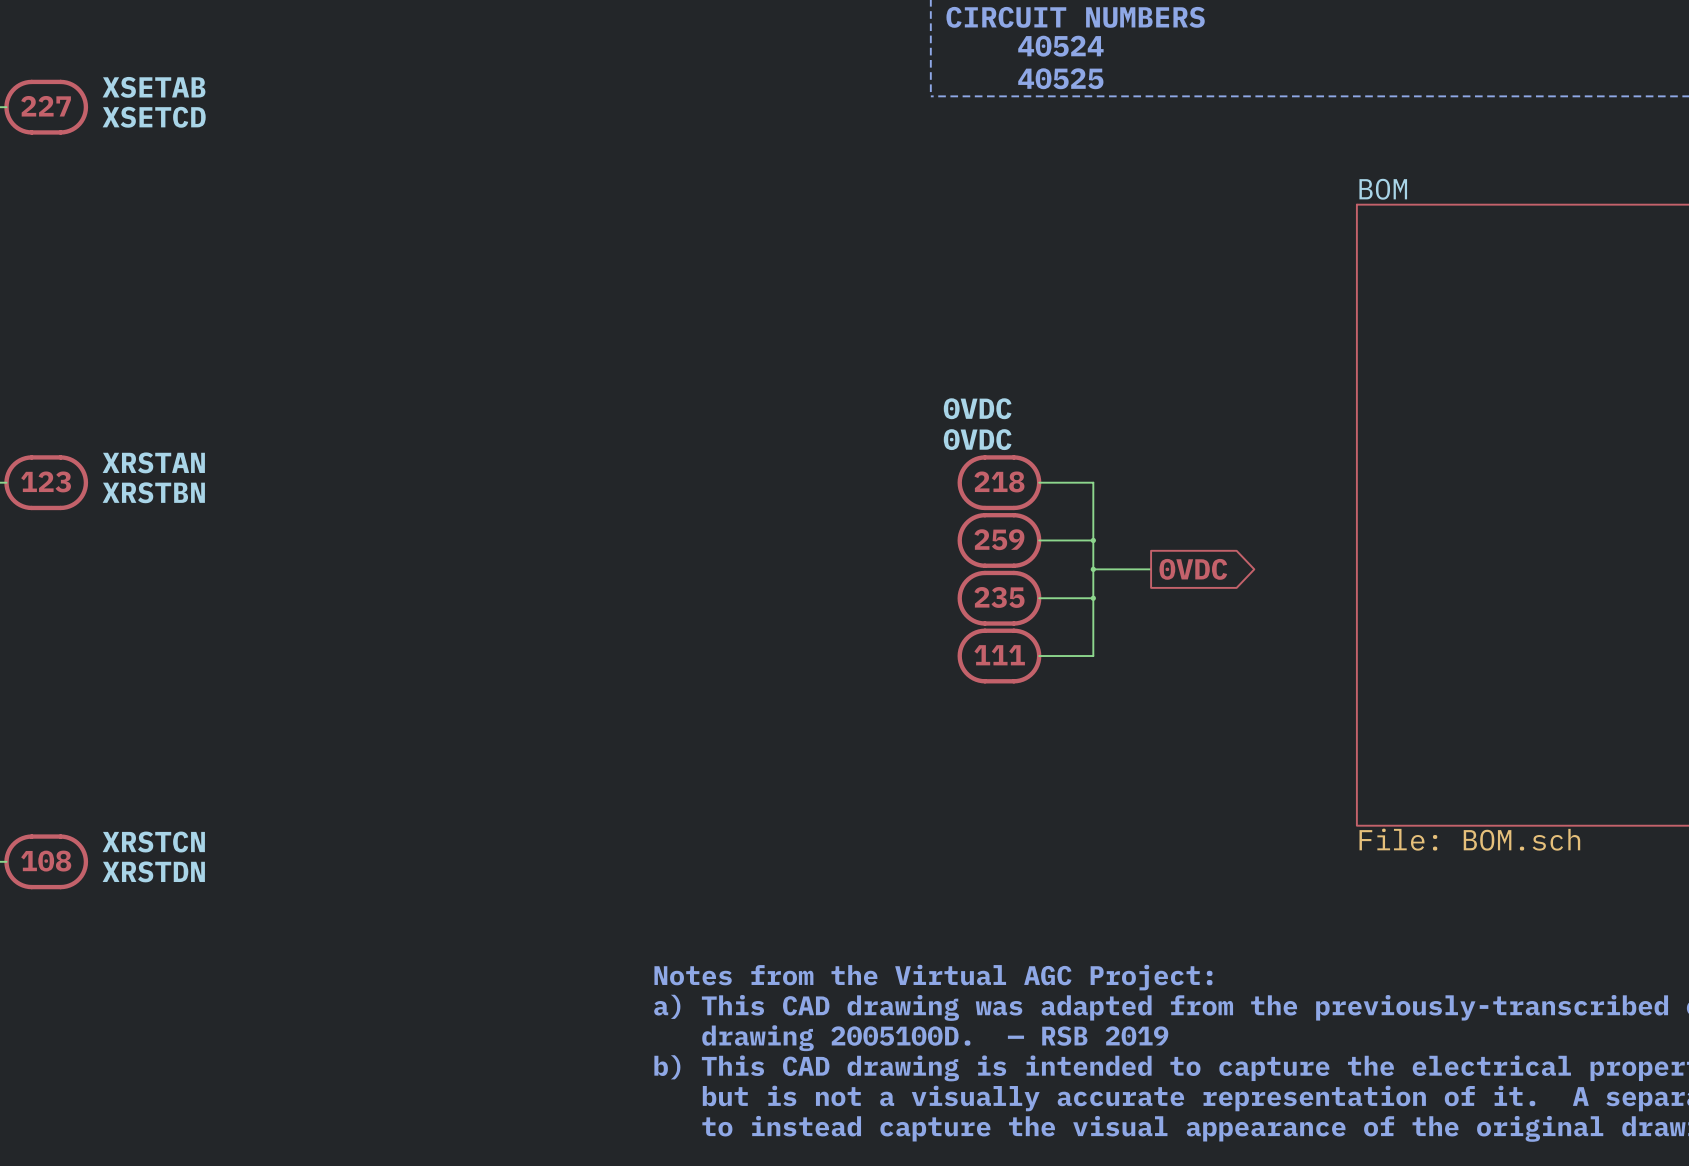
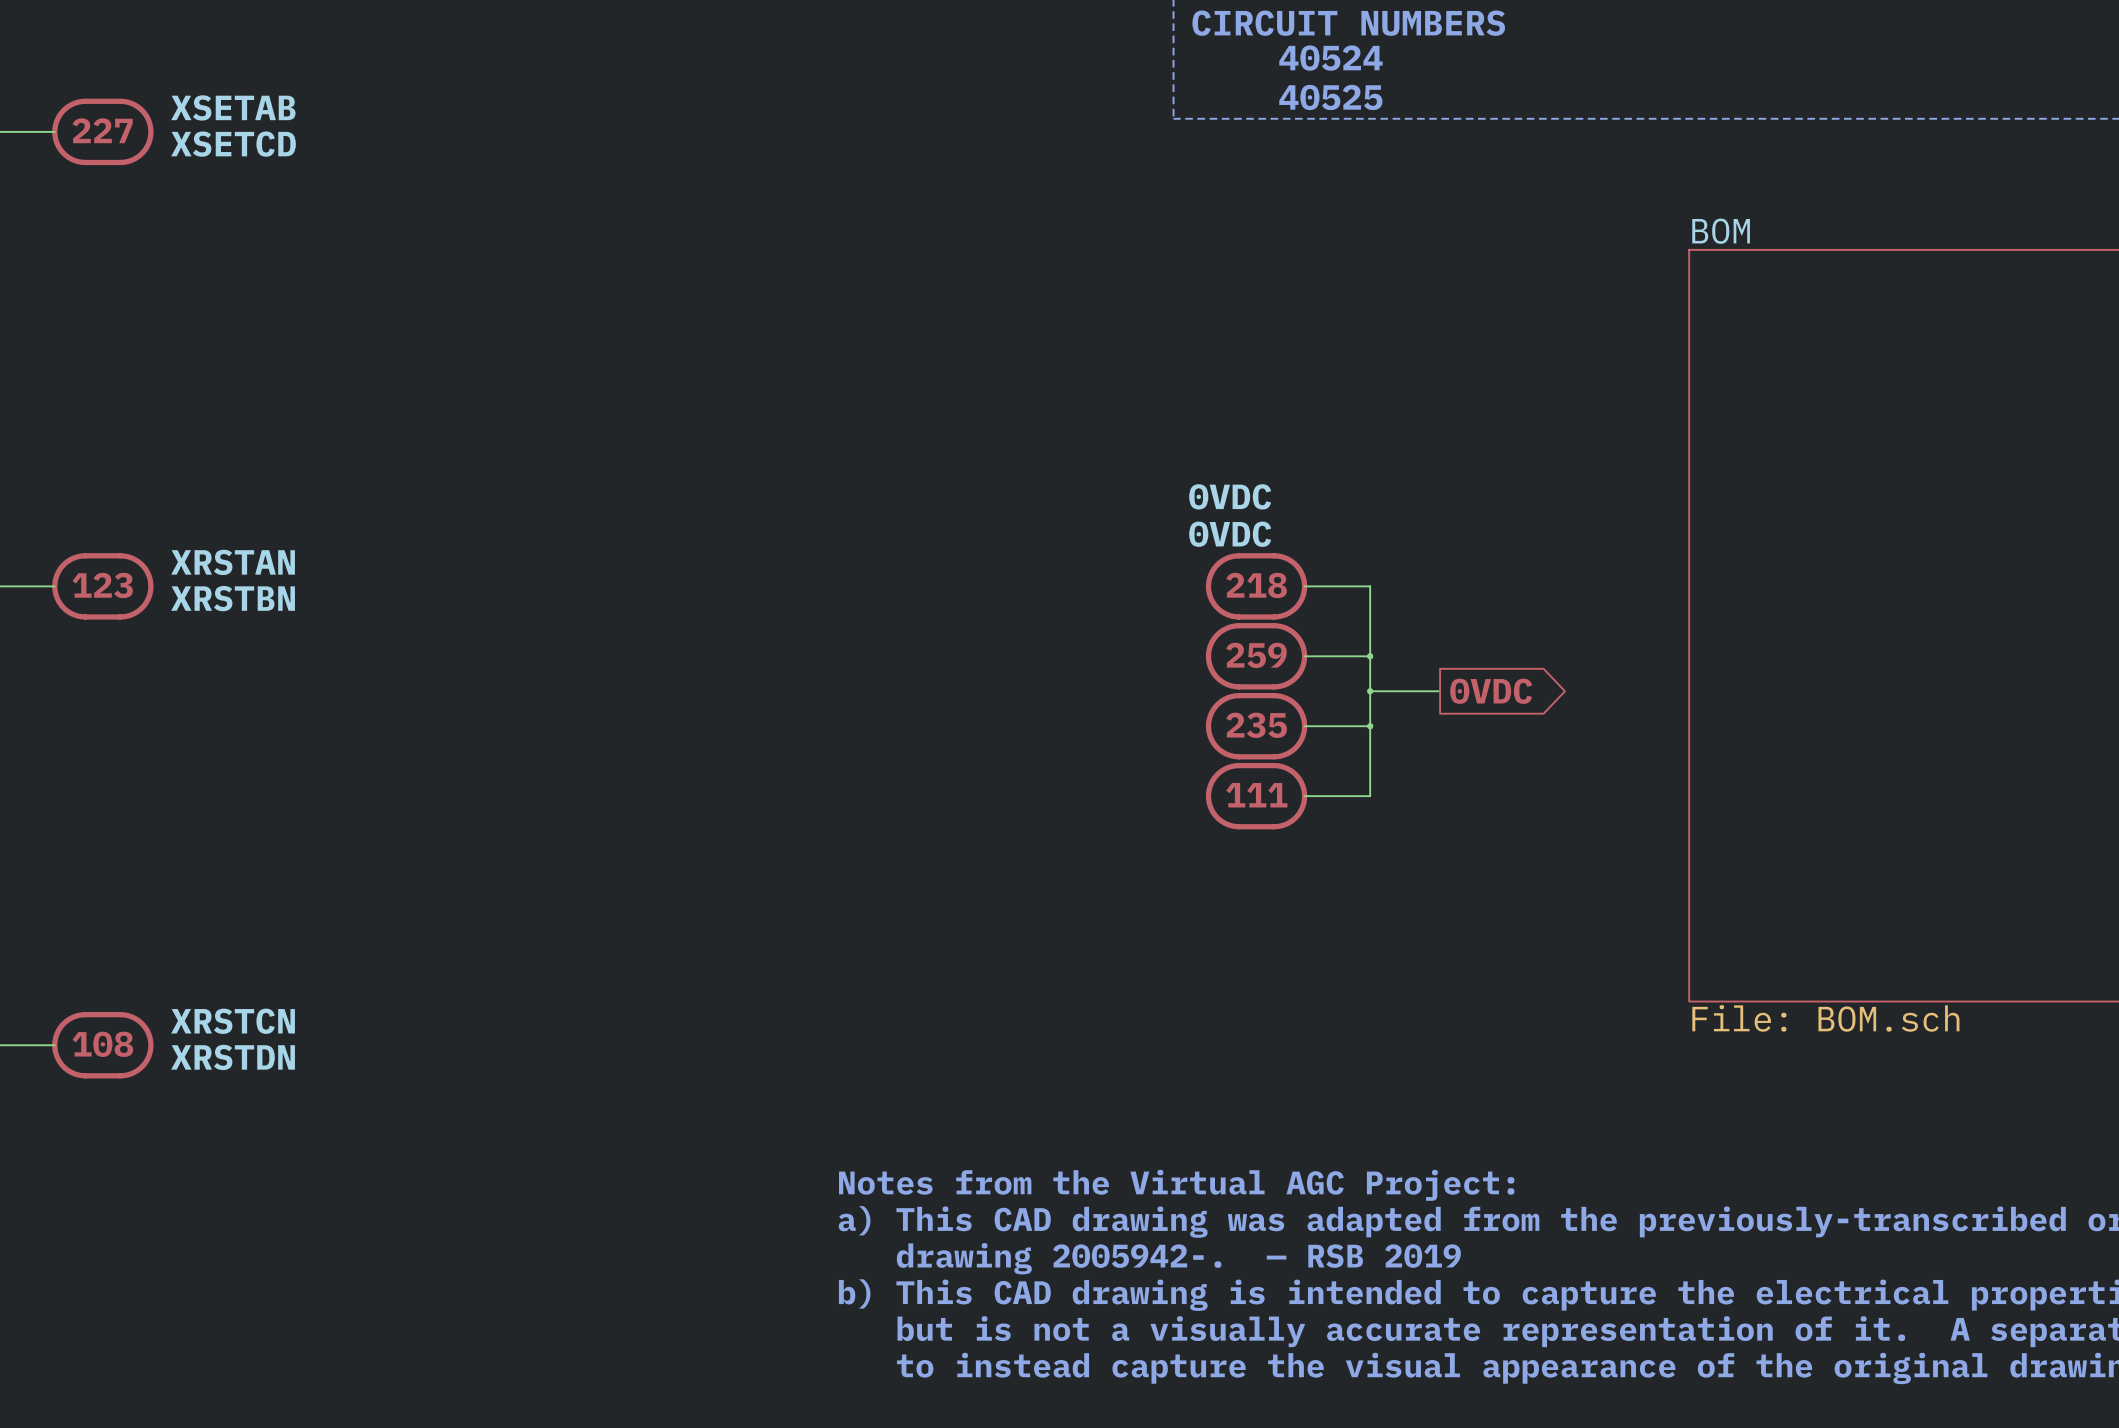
text: drawing 2005100D. — RSB 2019 (935, 1038) -> drawing 2005942-. — RSB 2019 (1178, 1258)

